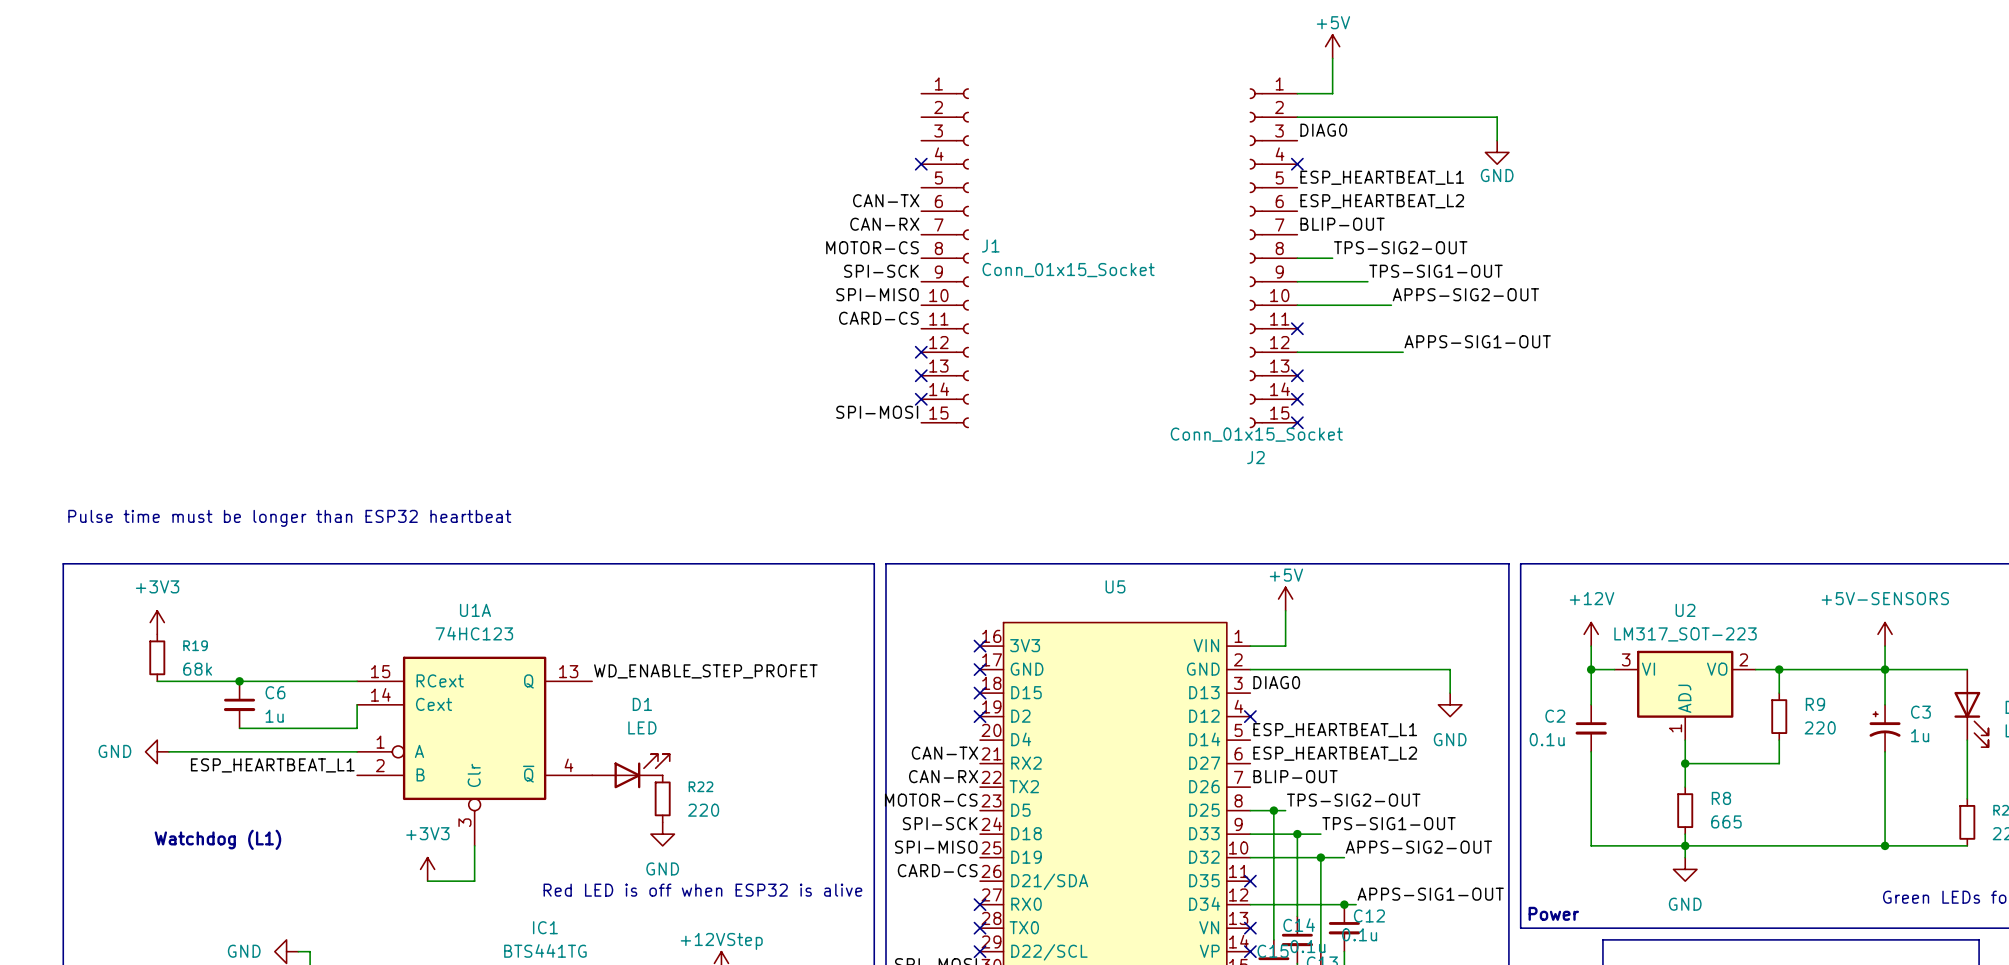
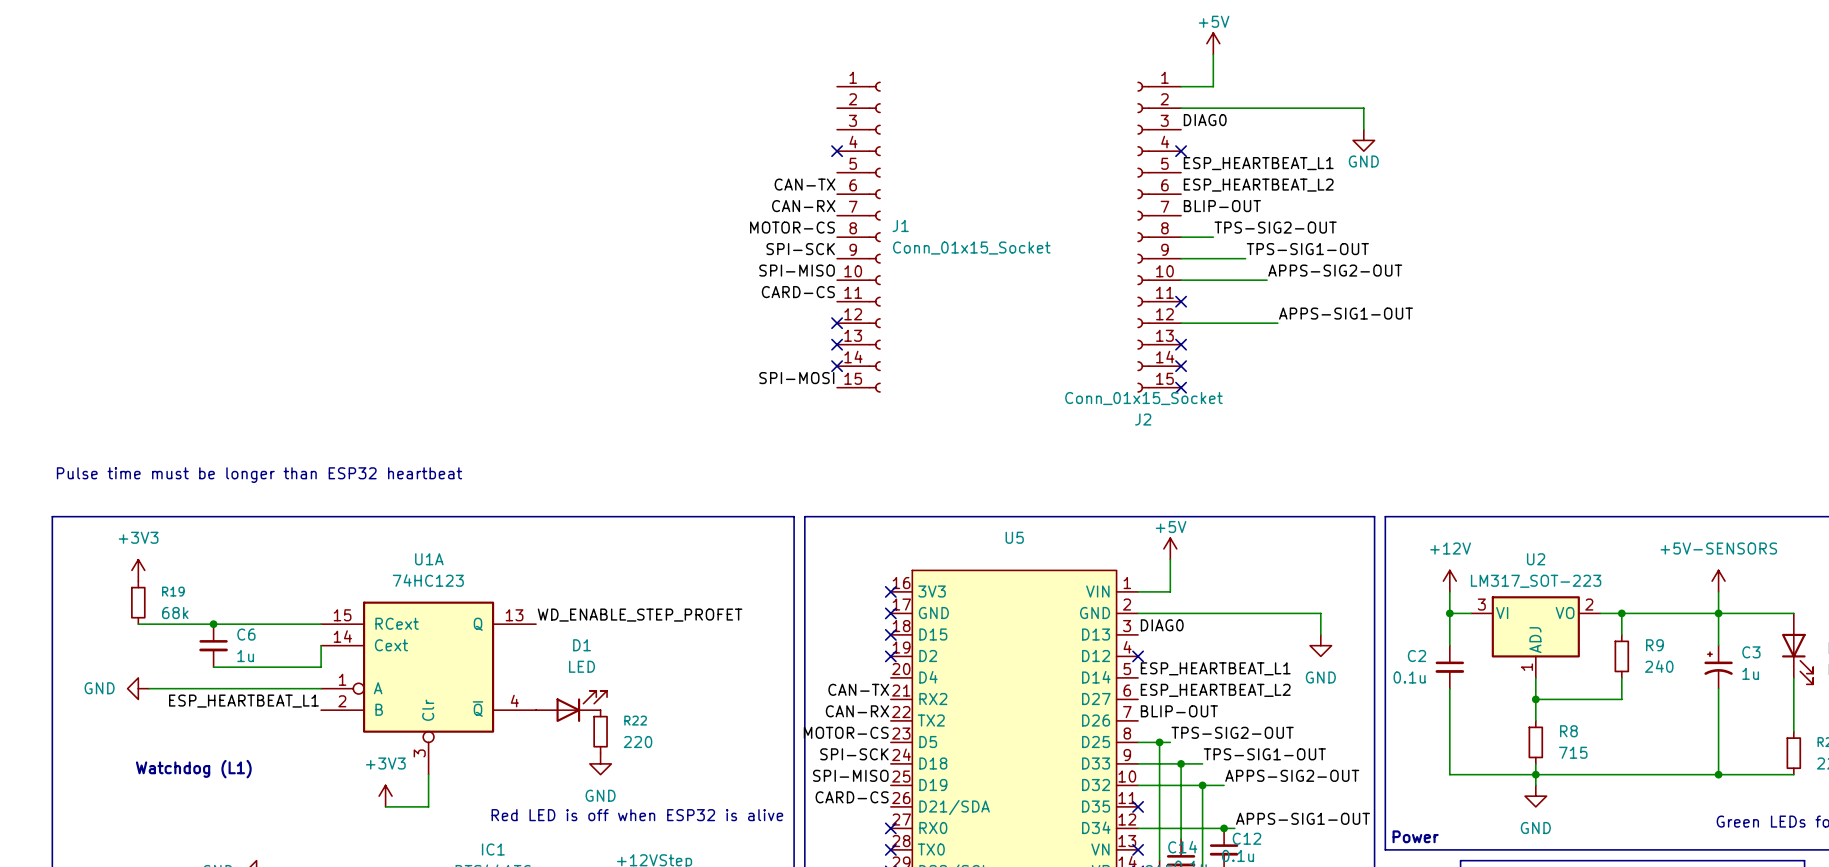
R9 value: 220 (1820, 727) -> 240 (1659, 666)
R8 value: 665 (1726, 821) -> 715 (1573, 752)

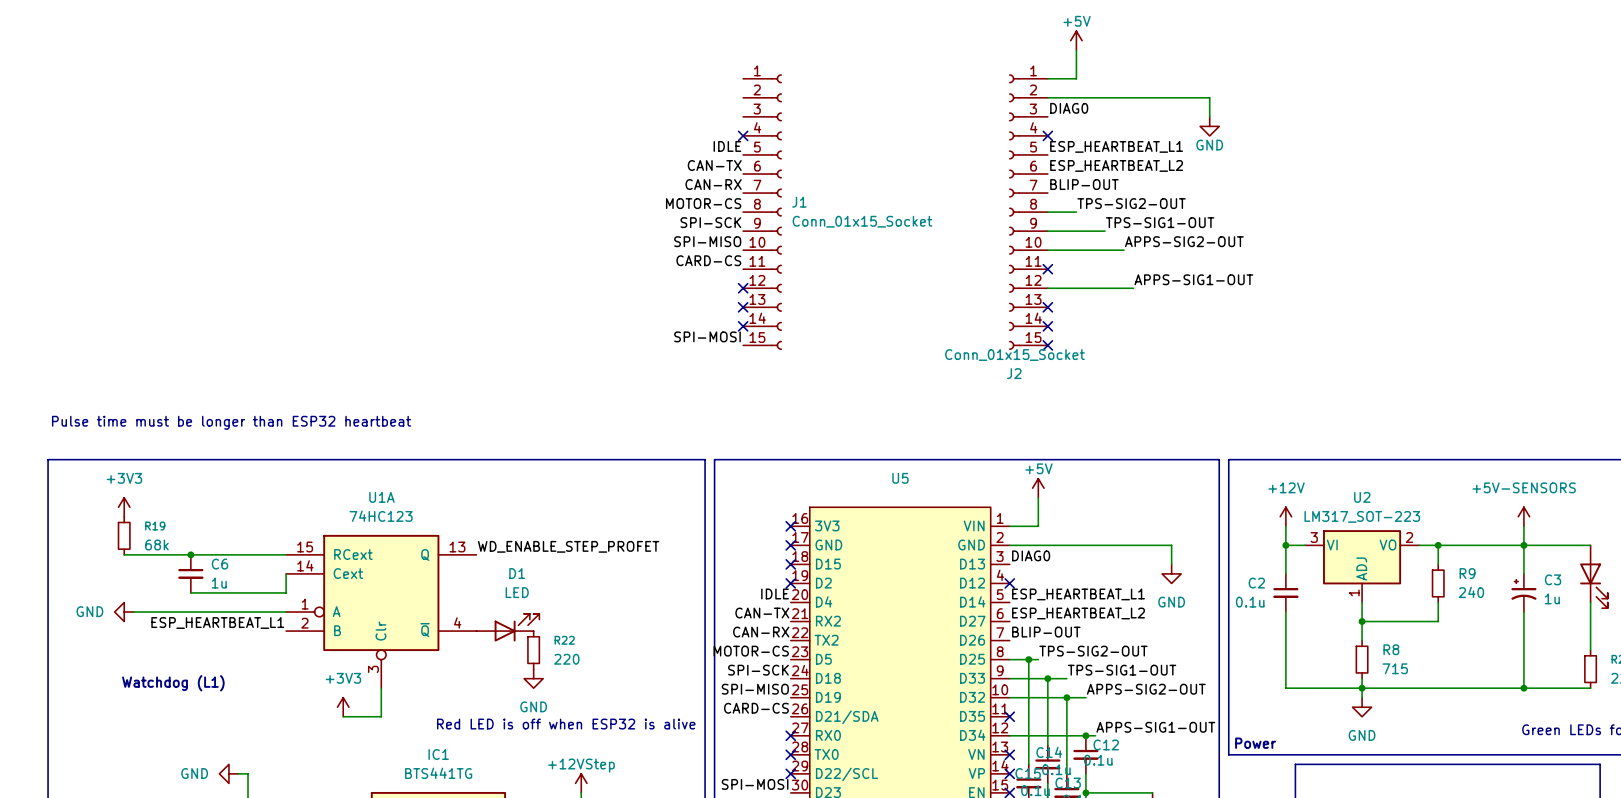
label: none -> IDLE (727, 146)
label: none -> IDLE (775, 593)

